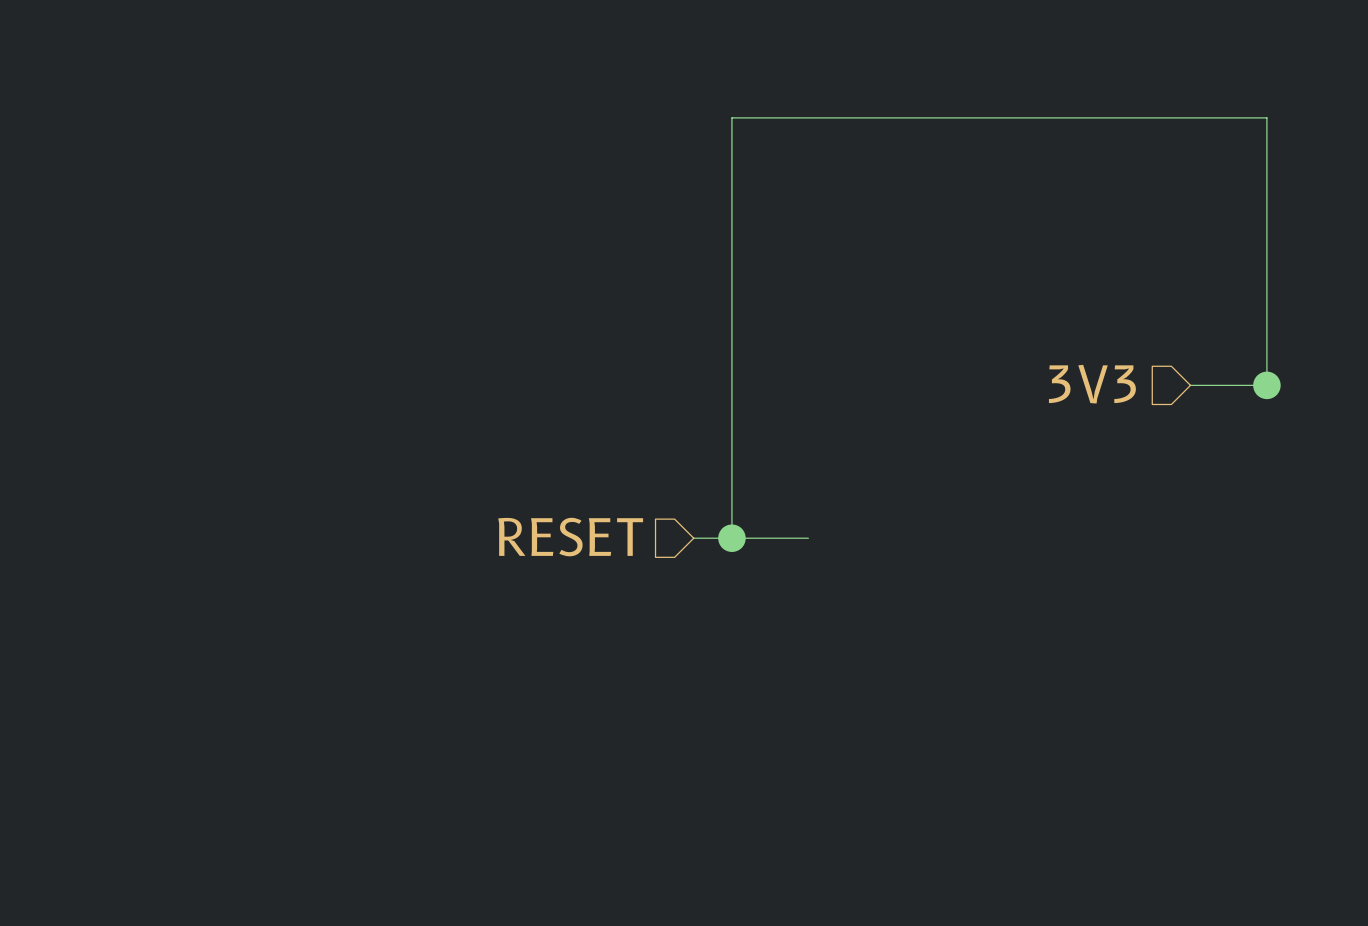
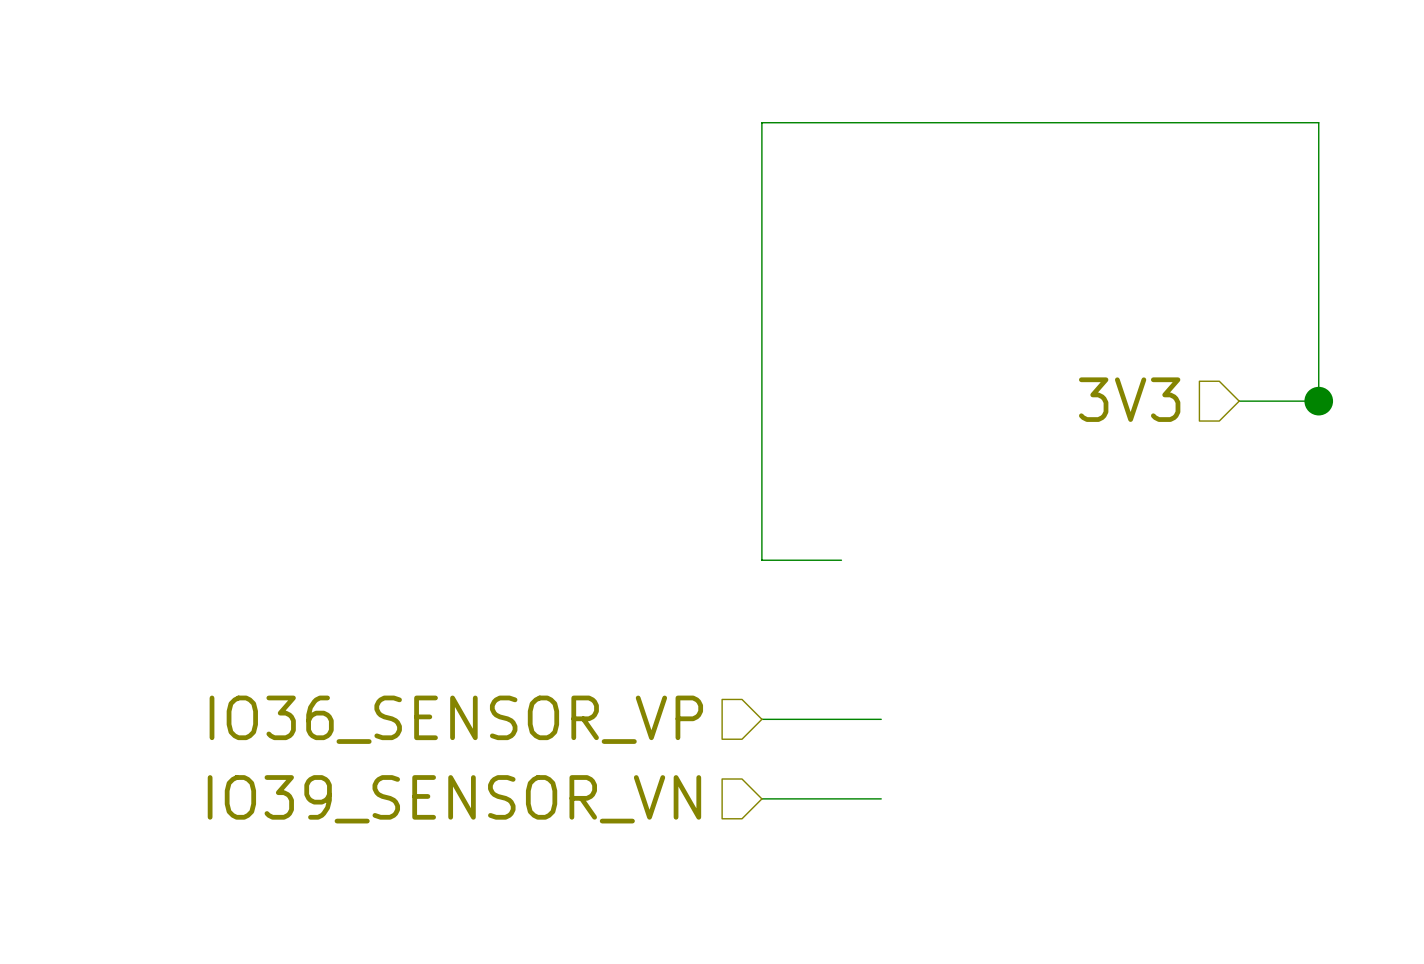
hierarchical label: RESET (570, 537) -> none
wire: (693, 538) (731, 538) -> none
junction: (731, 538) -> none
wire: none -> (761, 719) (881, 719)
hierarchical label: none -> IO36_SENSOR_VP (456, 719)
wire: none -> (761, 798) (881, 798)
hierarchical label: none -> IO39_SENSOR_VN (454, 799)

